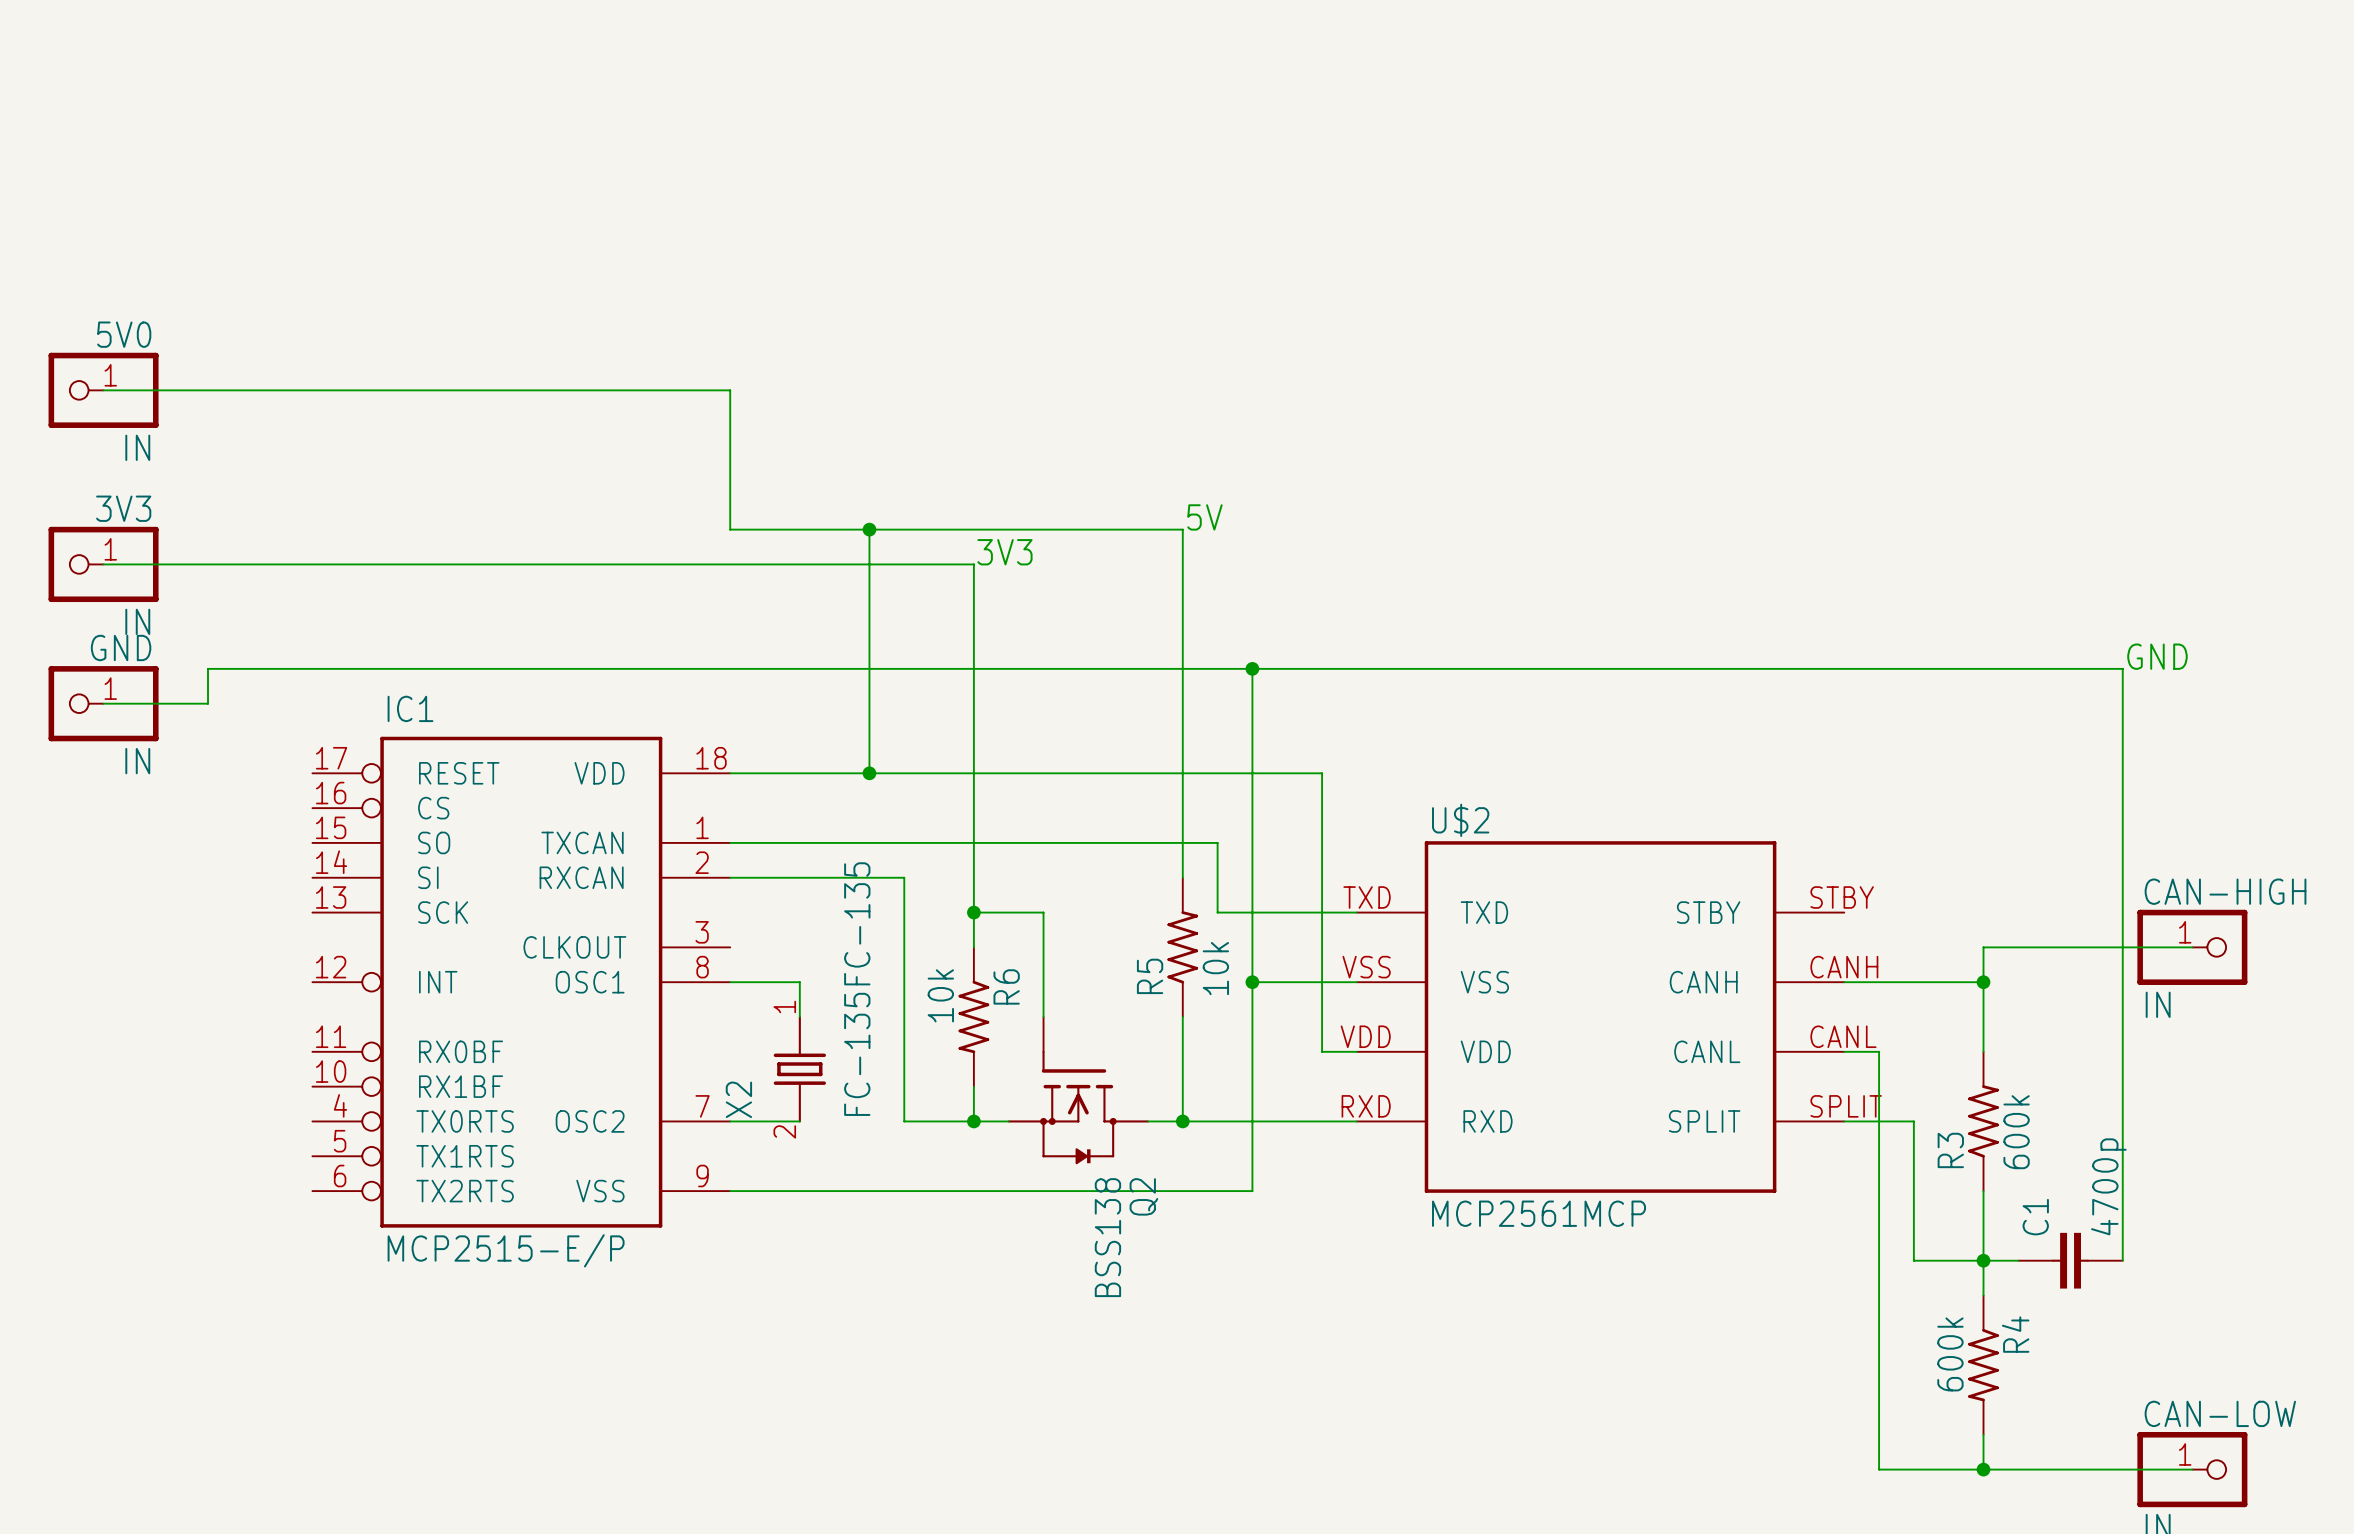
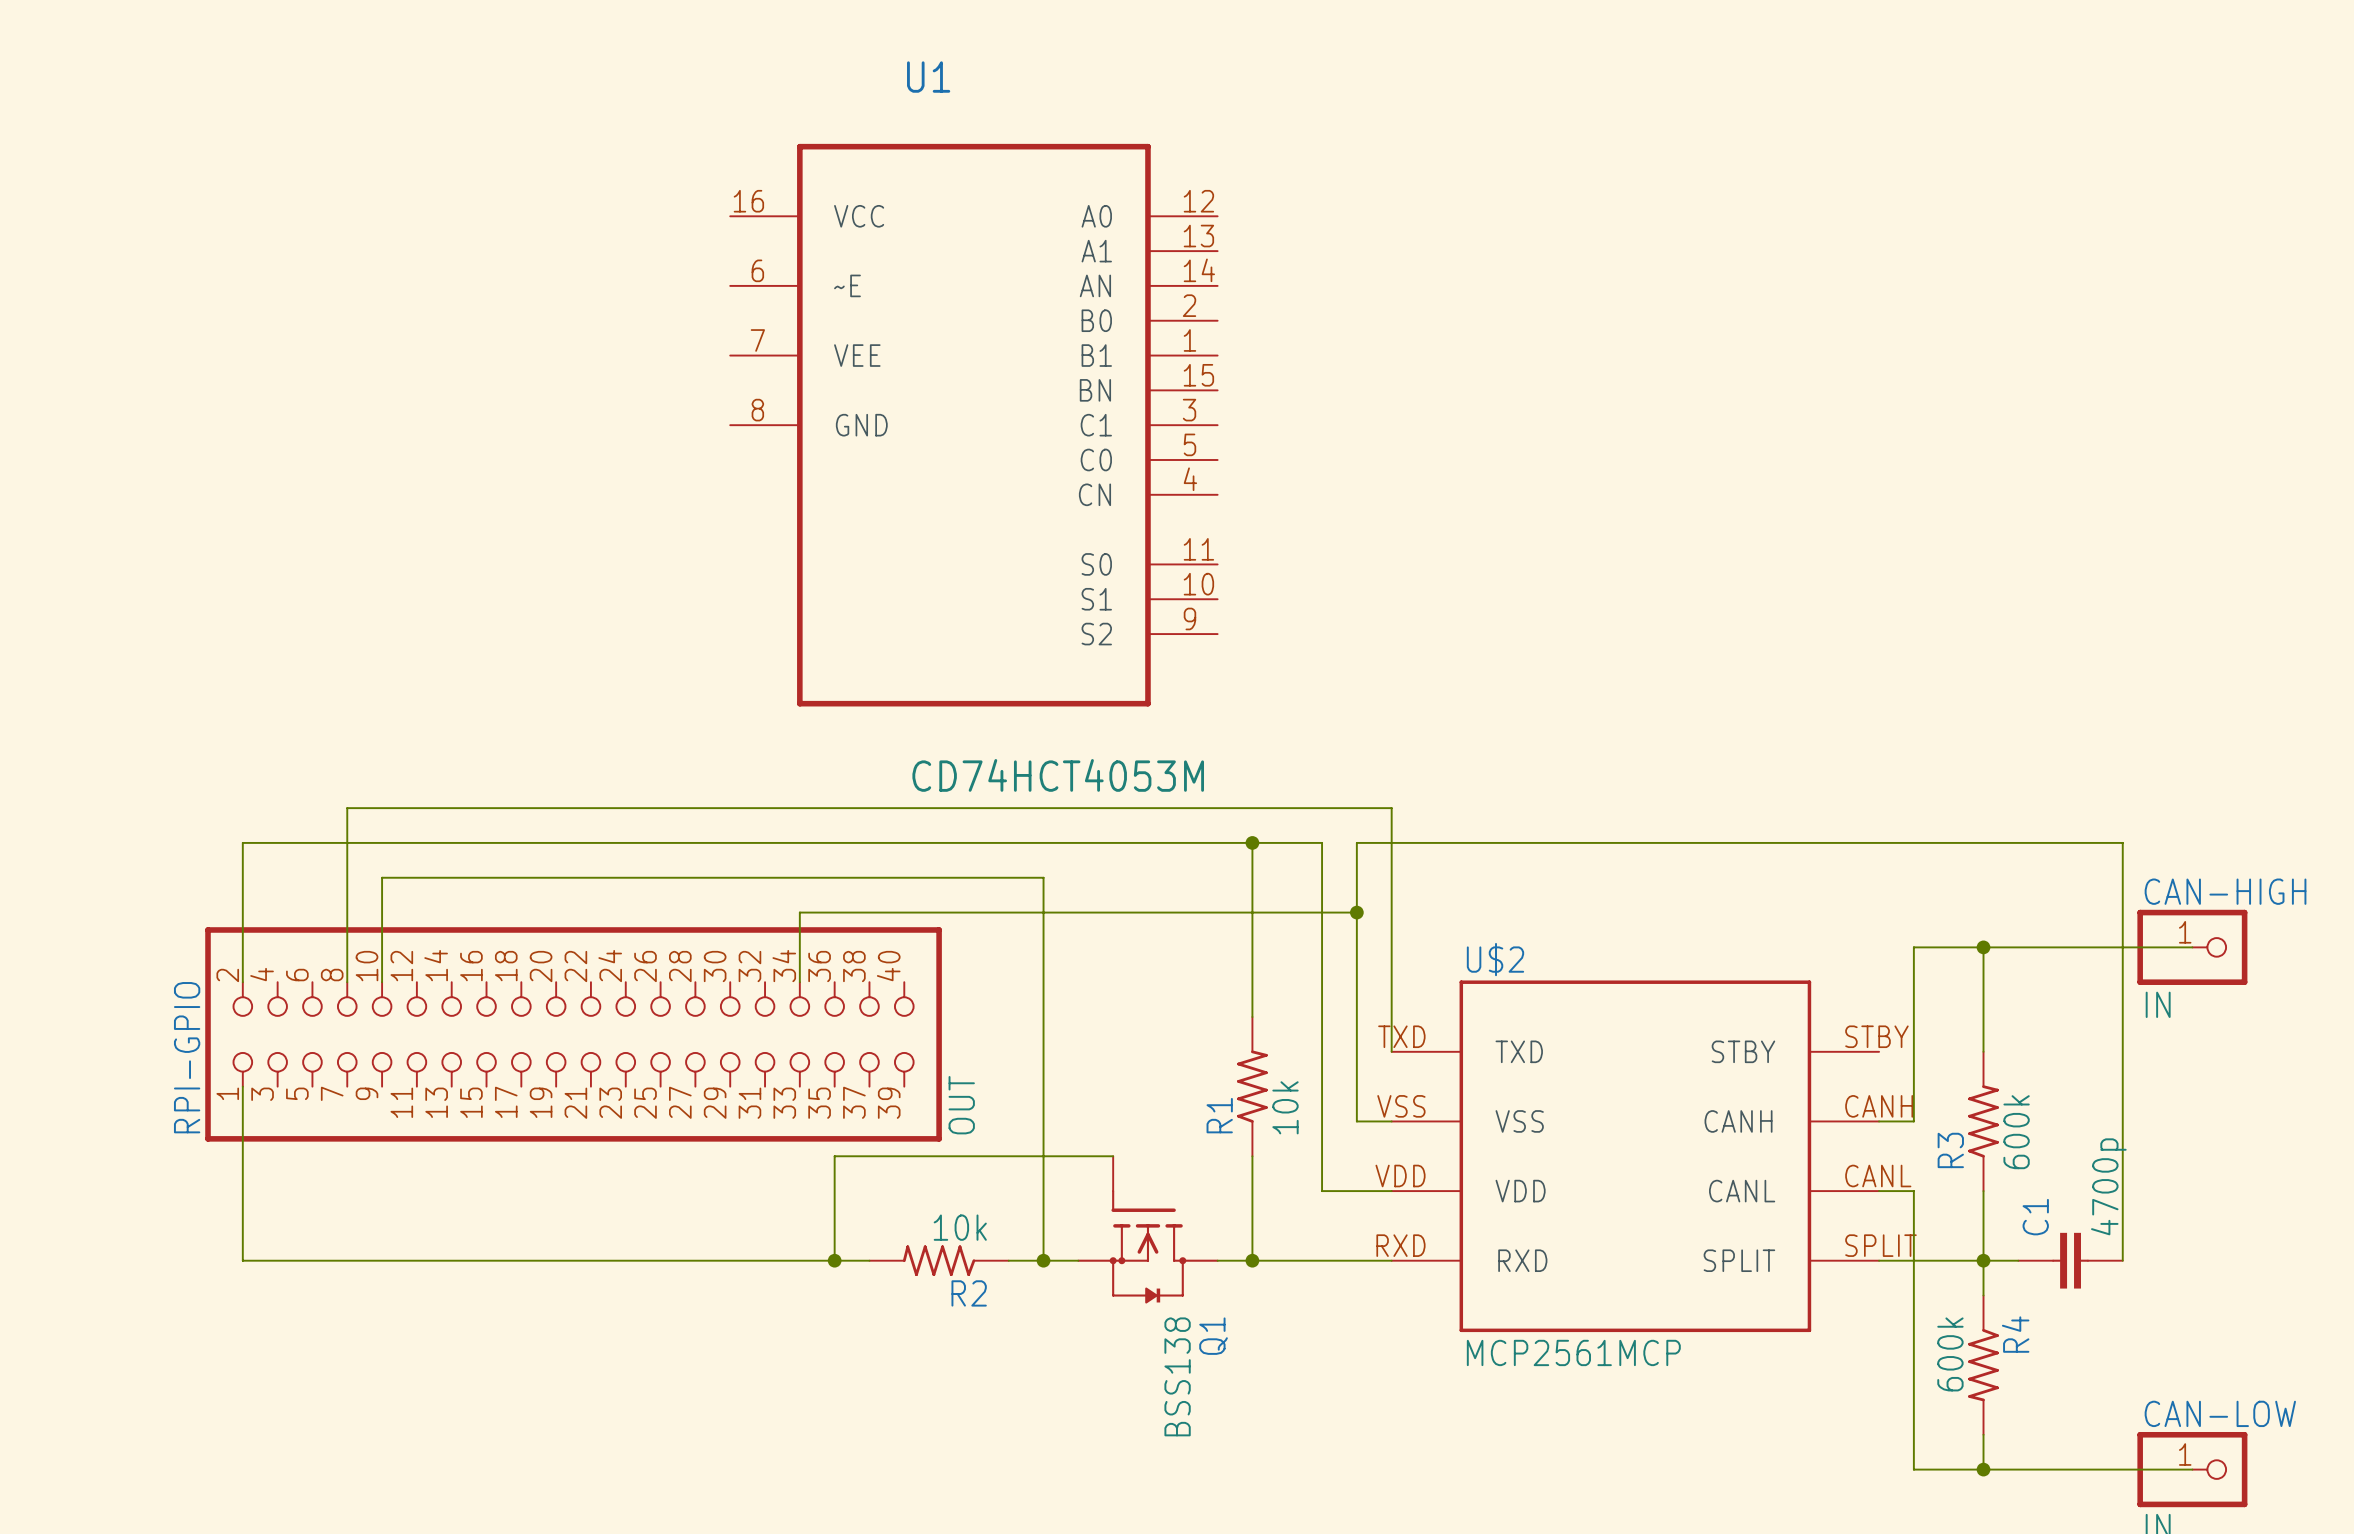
wire: (103, 390) (730, 390) (730, 529) (1182, 529) (1182, 877) -> none
5V0: IN (103, 390) -> none
U1: none -> CD74HCT4053M (973, 425)
text: 5V (1204, 517) -> none
wire: (869, 529) (869, 773) -> none
junction: (869, 529) -> none
text: 3V3 (1004, 552) -> none
wire: (103, 564) (973, 564) (973, 947) -> none
3V3: IN (103, 564) -> none
text: GND (2157, 656) -> none
wire: (1252, 668) (1252, 842) -> none
junction: (1252, 668) -> none
wire: (103, 703) (208, 703) (208, 668) (2122, 668) (2122, 842) -> (1391, 1121) (1356, 1121) (1356, 842) (2122, 842)
GND: IN (103, 703) -> none
wire: (730, 773) (1322, 773) (1322, 842) -> none
junction: (869, 773) -> none
wire: none -> (730, 842) (242, 842) (242, 982)
wire: (1217, 842) (1217, 912) -> (1217, 842) (1322, 842)
junction: none -> (1252, 842)
wire: none -> (730, 877) (382, 877) (382, 982)
wire: (904, 877) (904, 1121) (1008, 1121) -> (904, 877) (1043, 877) (1043, 912) (1217, 912)
wire: none -> (973, 912) (799, 912) (799, 982)
junction: (973, 912) -> none
junction: none -> (1356, 912)
R5: 10k (1182, 947) -> none
wire: none -> (1983, 947) (1913, 947) (1913, 1121)
wire: none -> (347, 982) (347, 808) (1391, 808) (1391, 1051)
IC1: MCP2515-E/P (521, 982) -> none
wire: (730, 982) (799, 982) (799, 1017) -> none
wire: (1252, 982) (1356, 982) -> none
junction: (1252, 982) -> none
wire: (1844, 982) (1983, 982) -> none
junction position: (1983, 982) -> (1983, 947)
R6: 10k (973, 1017) -> none
wire: none -> (1043, 1017) (1043, 1260)
wire: (1182, 1017) (1182, 1121) -> none
U$2 position: (1600, 1017) -> (1635, 1156)
RPI-GPIO: none -> OUT (573, 1034)
wire: (1322, 1051) (1356, 1051) -> (1322, 1051) (1322, 1191) (1391, 1191)
wire: (1844, 1051) (1879, 1051) (1879, 1469) (1913, 1469) -> (1879, 1260) (1913, 1260) (1913, 1469)
X2: FC-135FC-135 (799, 1069) -> none
wire: none -> (242, 1086) (242, 1260) (869, 1260)
wire: (973, 1086) (973, 1121) -> none
R1: none -> 10k (1252, 1086)
Q2: BSS138 (1078, 1090) -> none
wire: (730, 1121) (799, 1121) -> (1008, 1260) (1078, 1260)
junction: (973, 1121) -> none
wire: (1147, 1121) (1356, 1121) -> none
junction: (1182, 1121) -> none
wire: (1913, 1121) (1913, 1191) -> (1879, 1191) (1913, 1191)
wire: none -> (1113, 1156) (834, 1156) (834, 1260)
wire: (730, 1191) (1252, 1191) -> (1252, 1260) (1252, 1191)
Q1: none -> BSS138 (1147, 1229)
junction: none -> (834, 1260)
R2: none -> 10k (939, 1260)
junction: none -> (1043, 1260)
wire: none -> (1217, 1260) (1391, 1260)
junction: none -> (1252, 1260)

